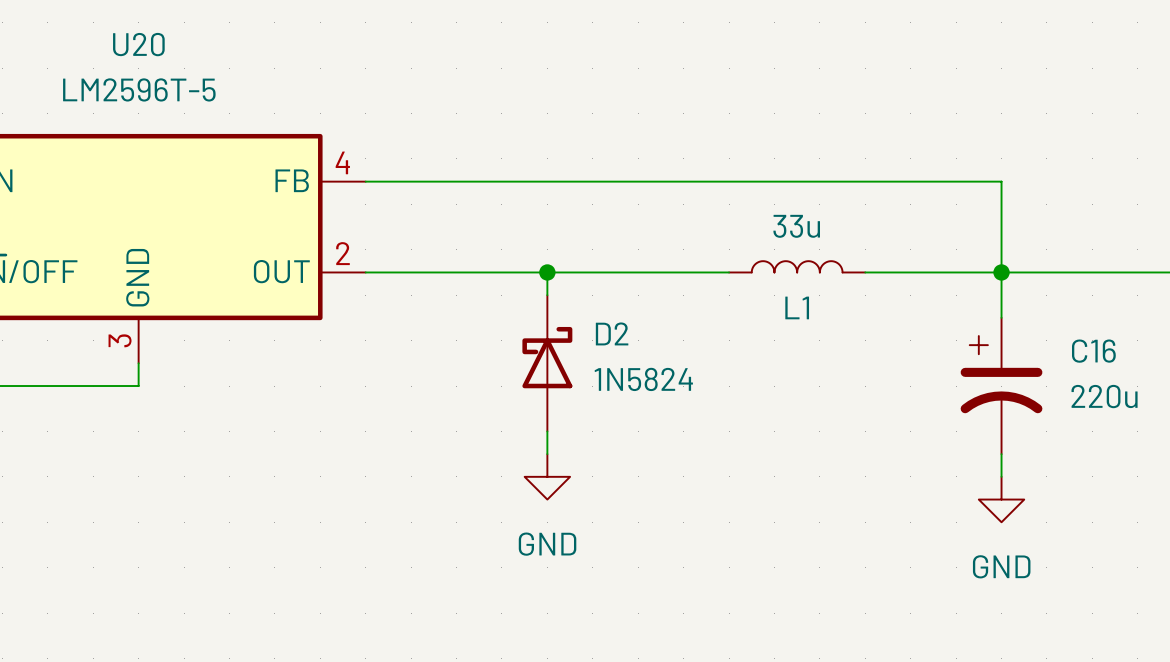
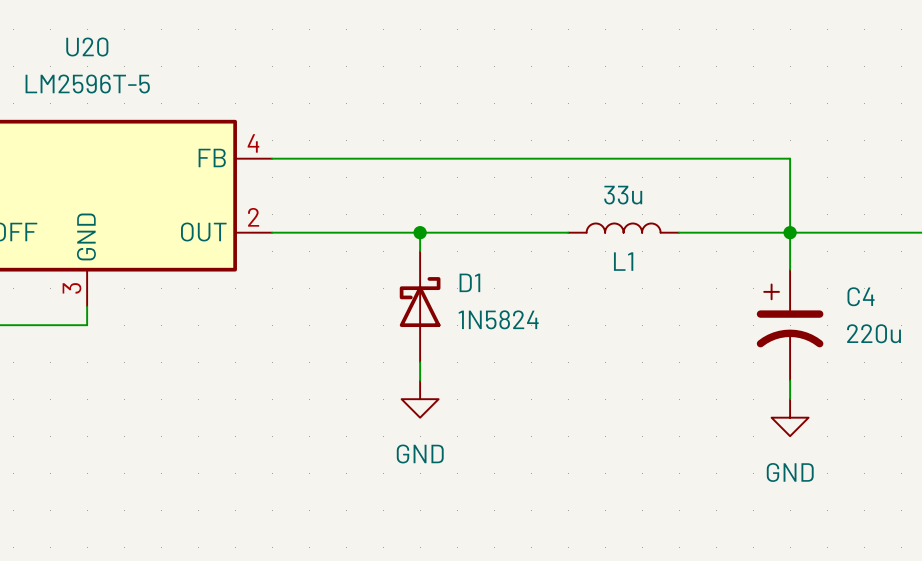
D2 name: D2 (612, 333) -> D1 (469, 282)
C16 name: C16 (1093, 351) -> C4 (861, 296)

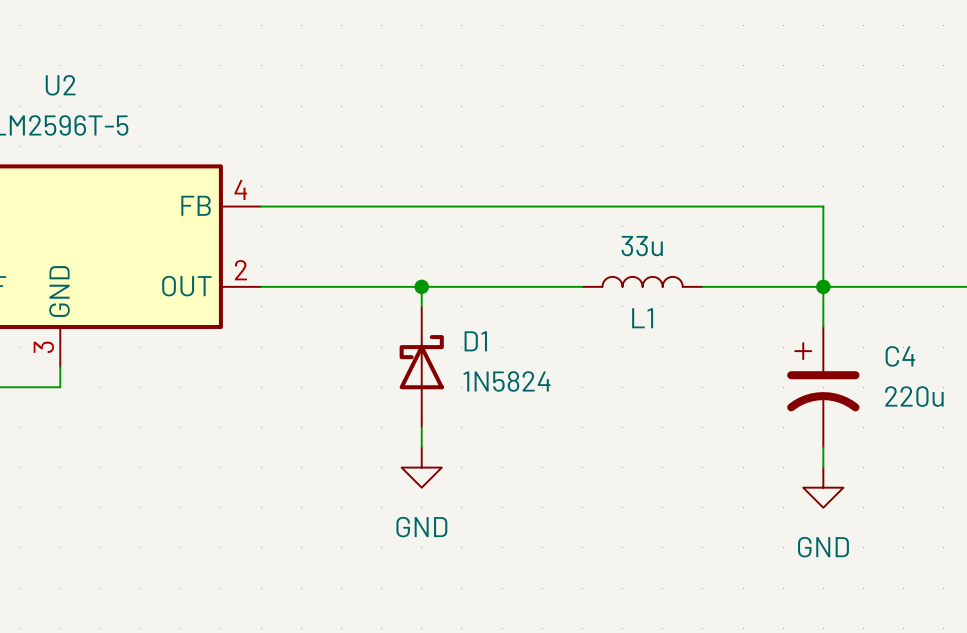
U20 name: U20 (87, 47) -> U2 (60, 85)

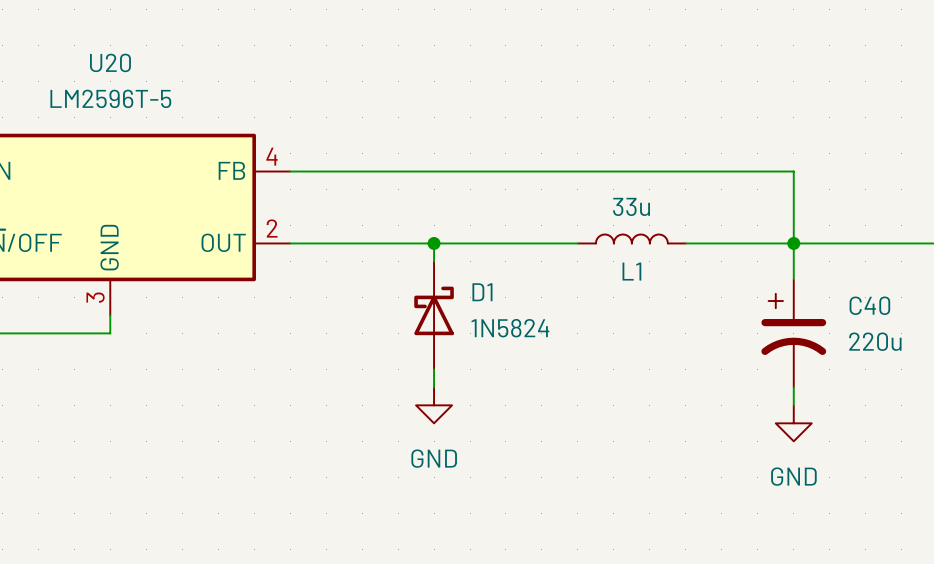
U2 name: U2 (60, 85) -> U20 (110, 62)
C4 name: C4 (900, 356) -> C40 (869, 305)

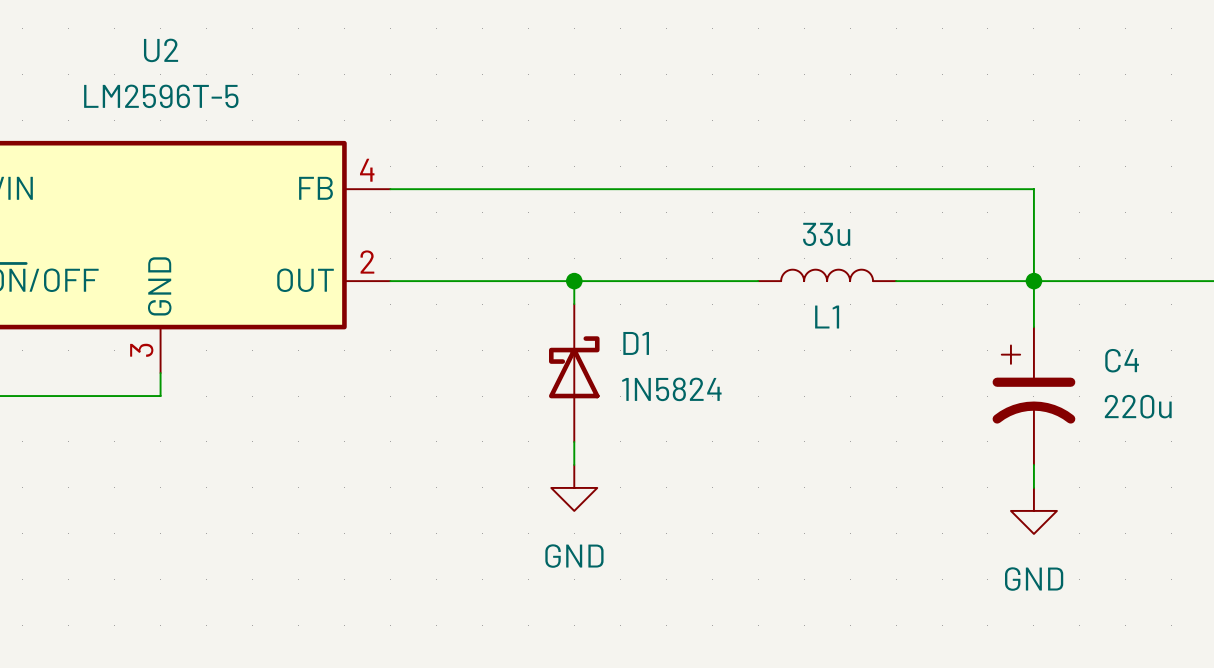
U20 name: U20 (110, 62) -> U2 (161, 50)
C40 name: C40 (869, 305) -> C4 (1122, 360)

